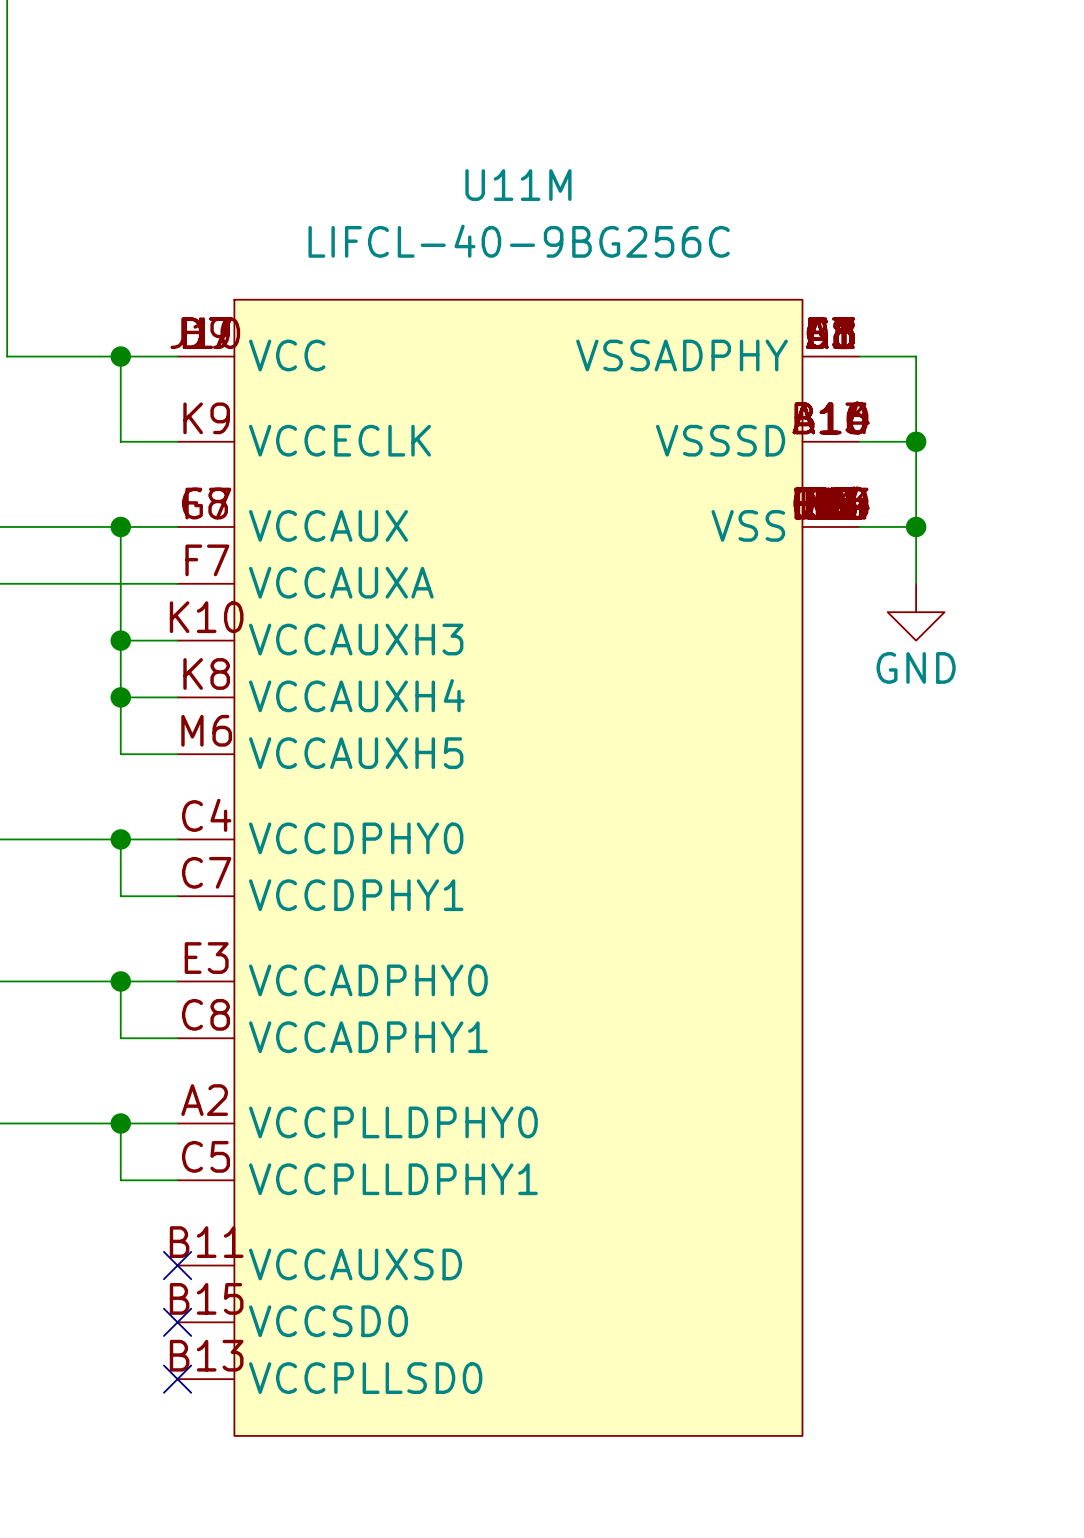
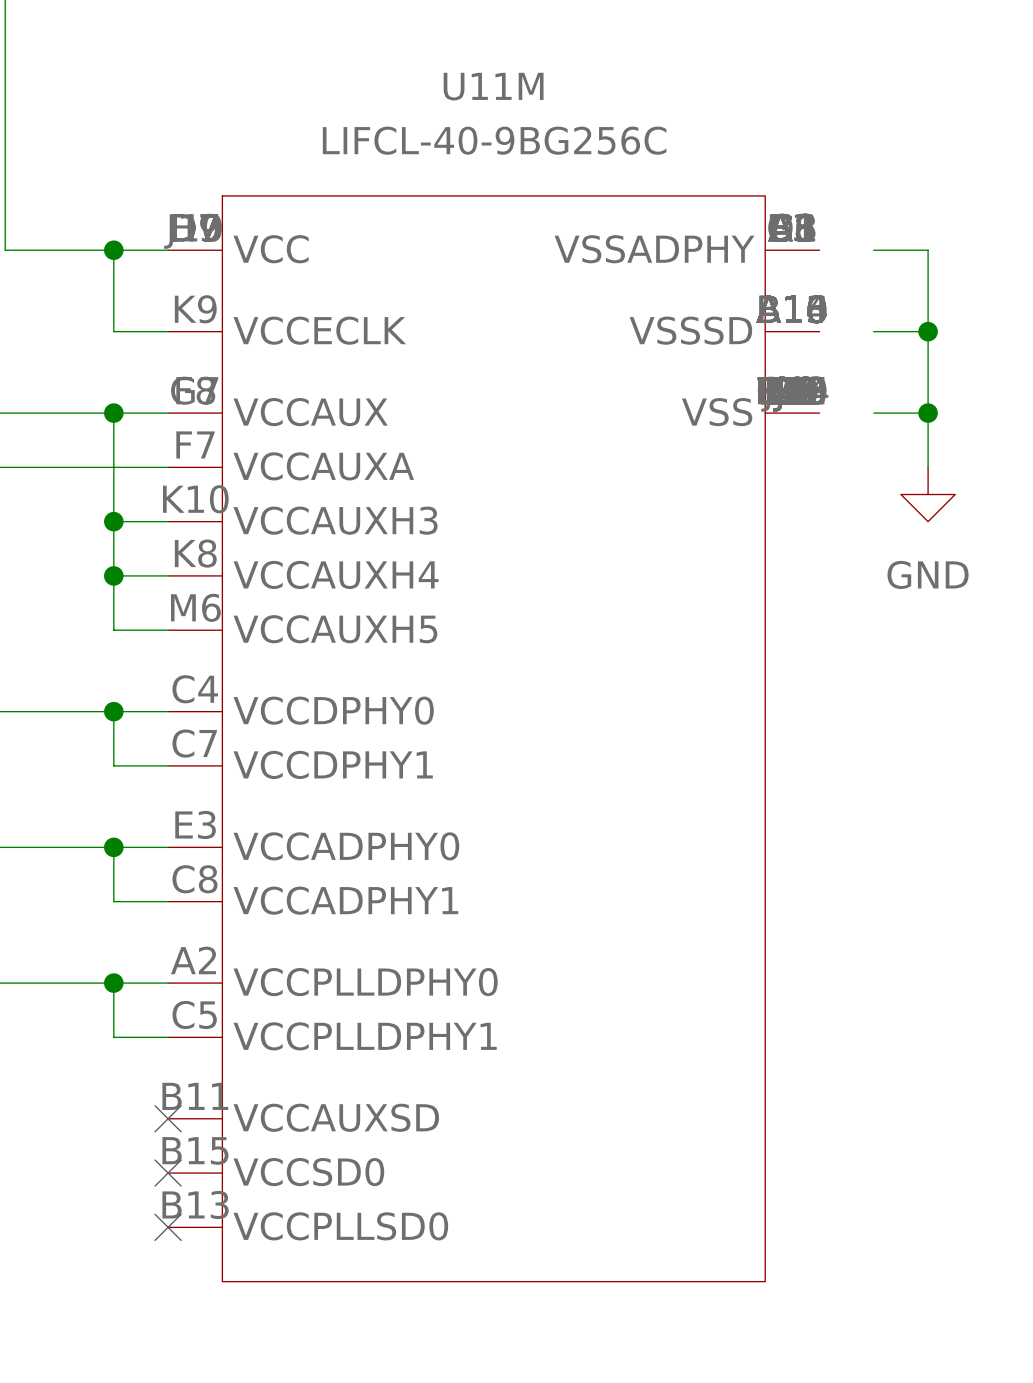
wire: (859, 356) (916, 356) (916, 583) -> (873, 250) (928, 250) (928, 467)
wire: (859, 441) (916, 441) -> (928, 331) (873, 331)
junction: (916, 441) -> none
junction: none -> (928, 331)
wire: (859, 526) (916, 526) -> (928, 413) (873, 413)
junction: (916, 526) -> none
junction: none -> (928, 413)
power symbol position: GND (916, 612) -> GND (928, 494)
power symbol text position: GND (916, 667) -> GND (928, 574)

